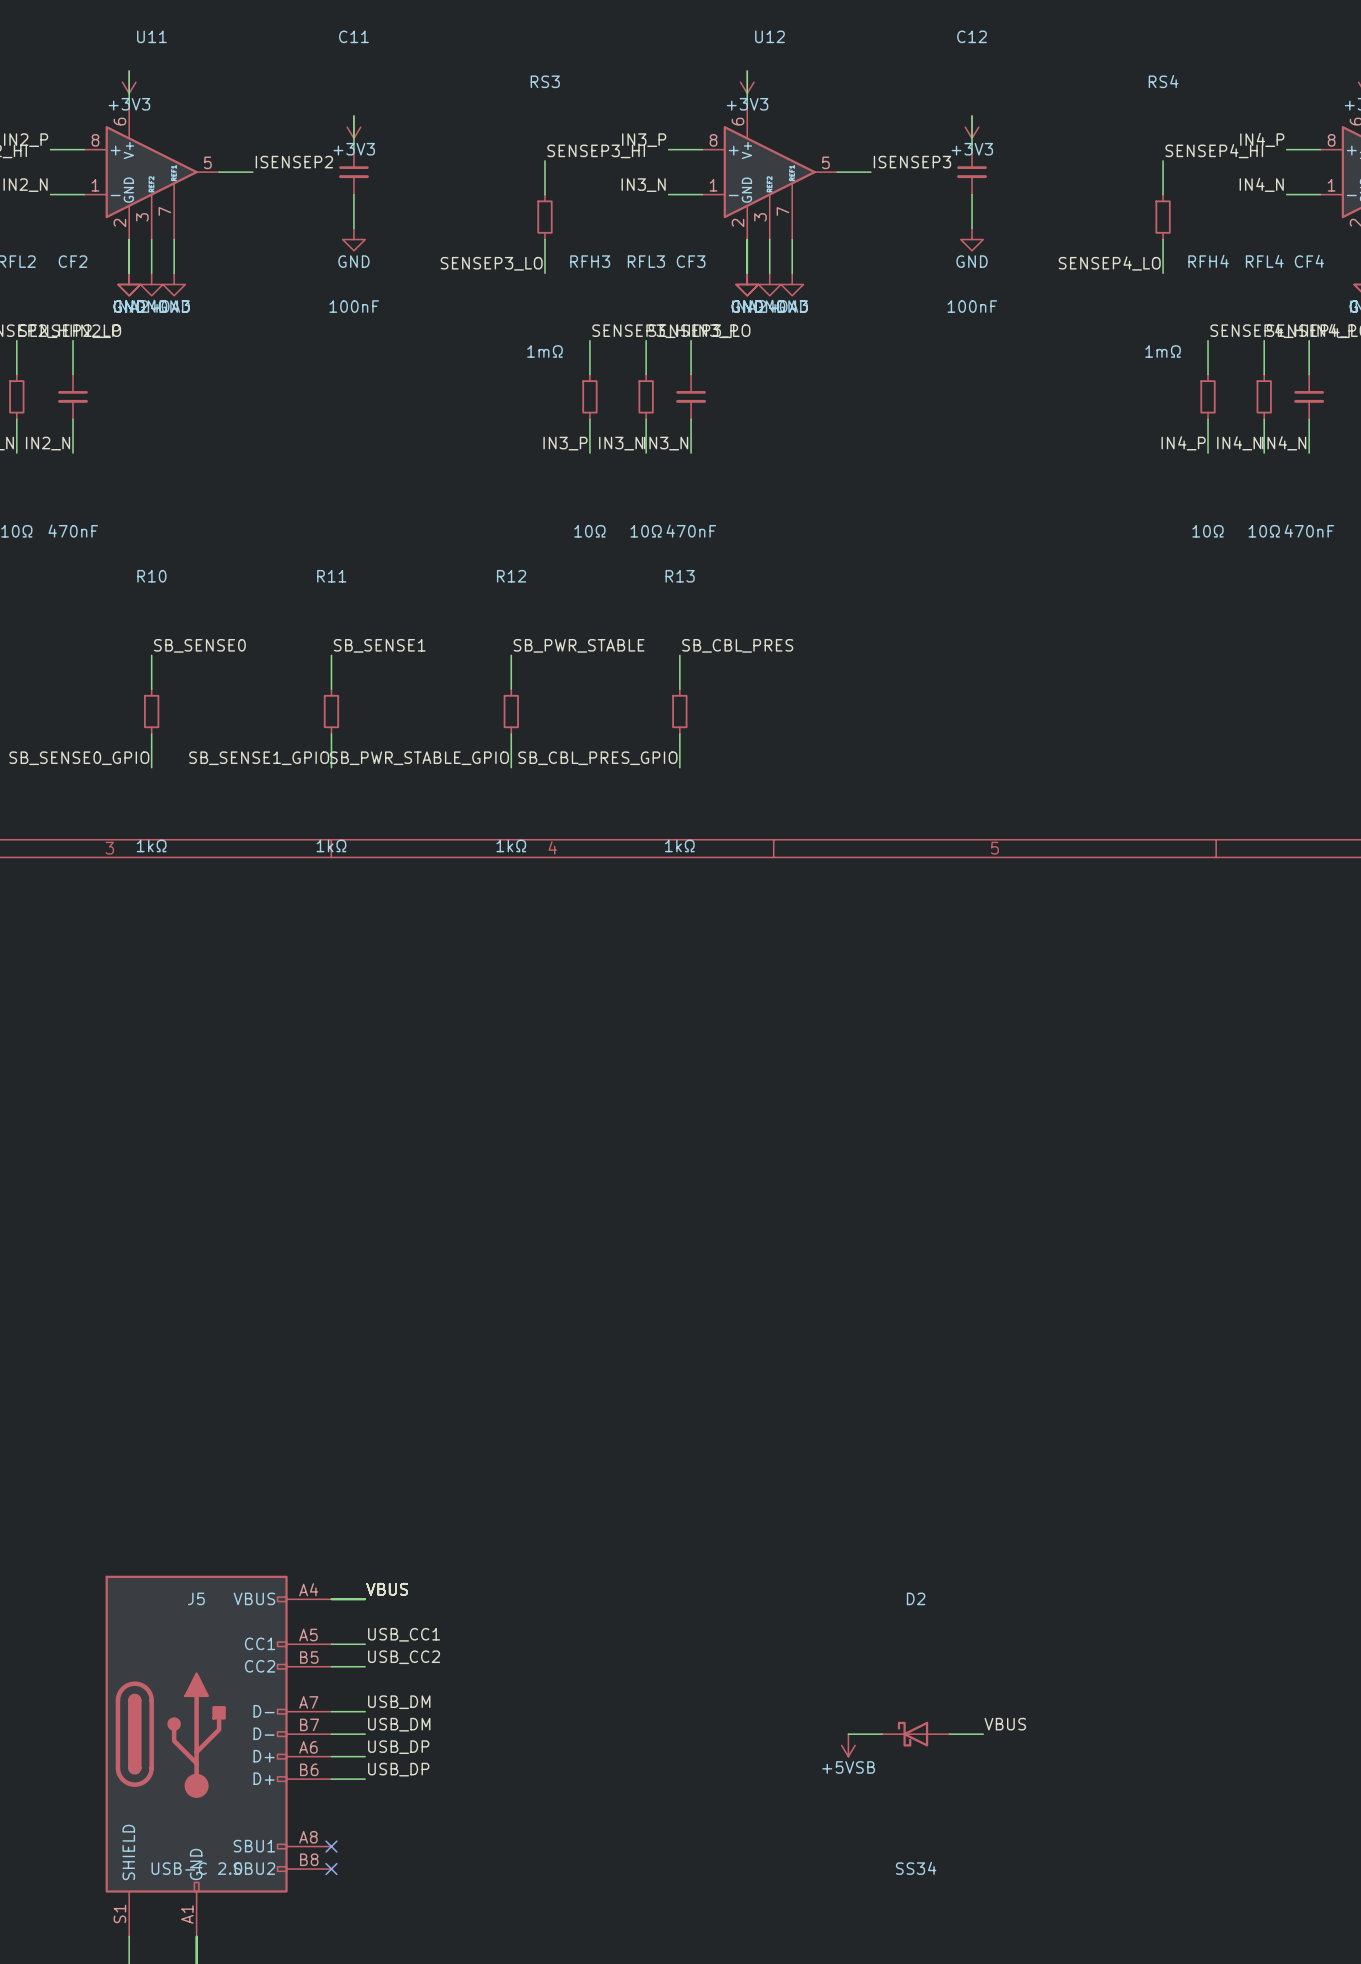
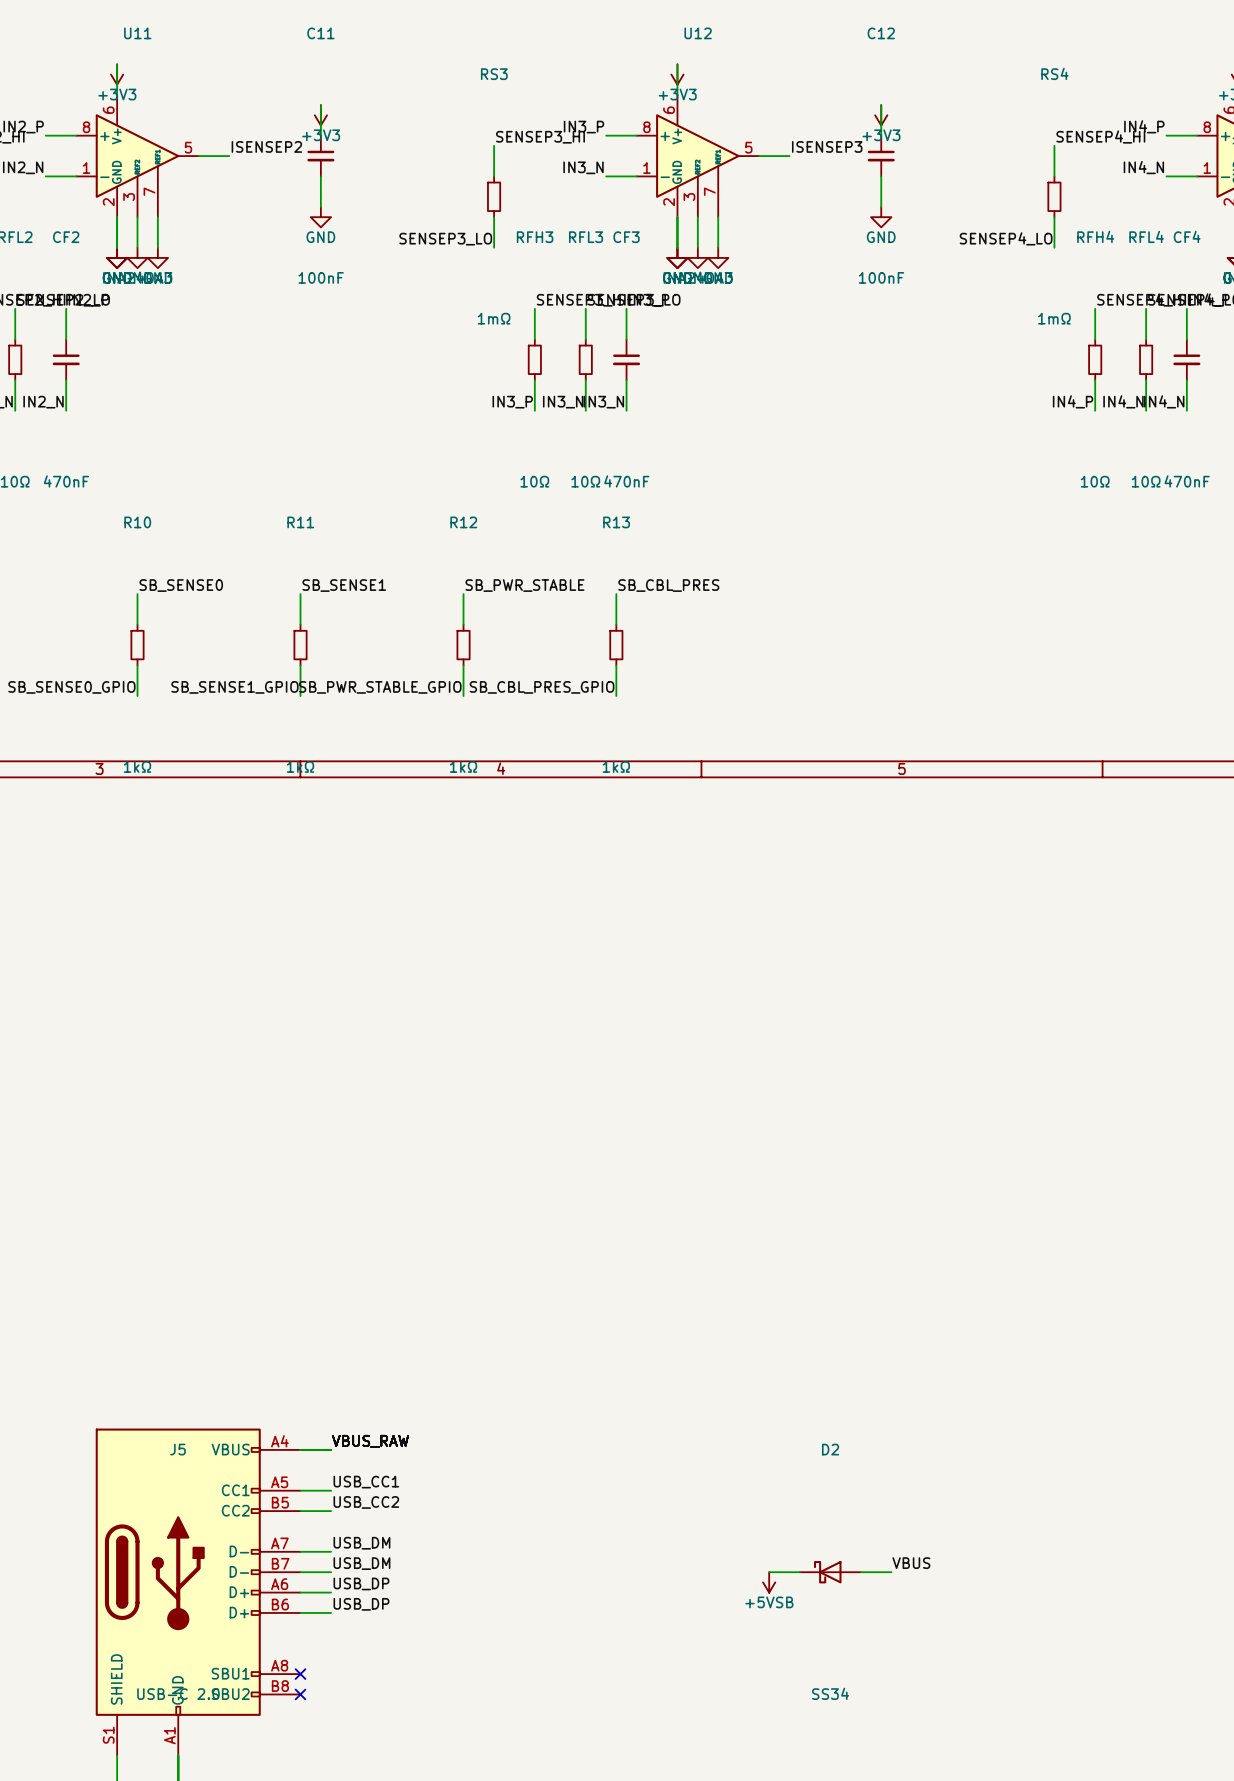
label: VBUS (387, 1589) -> VBUS_RAW (370, 1441)

